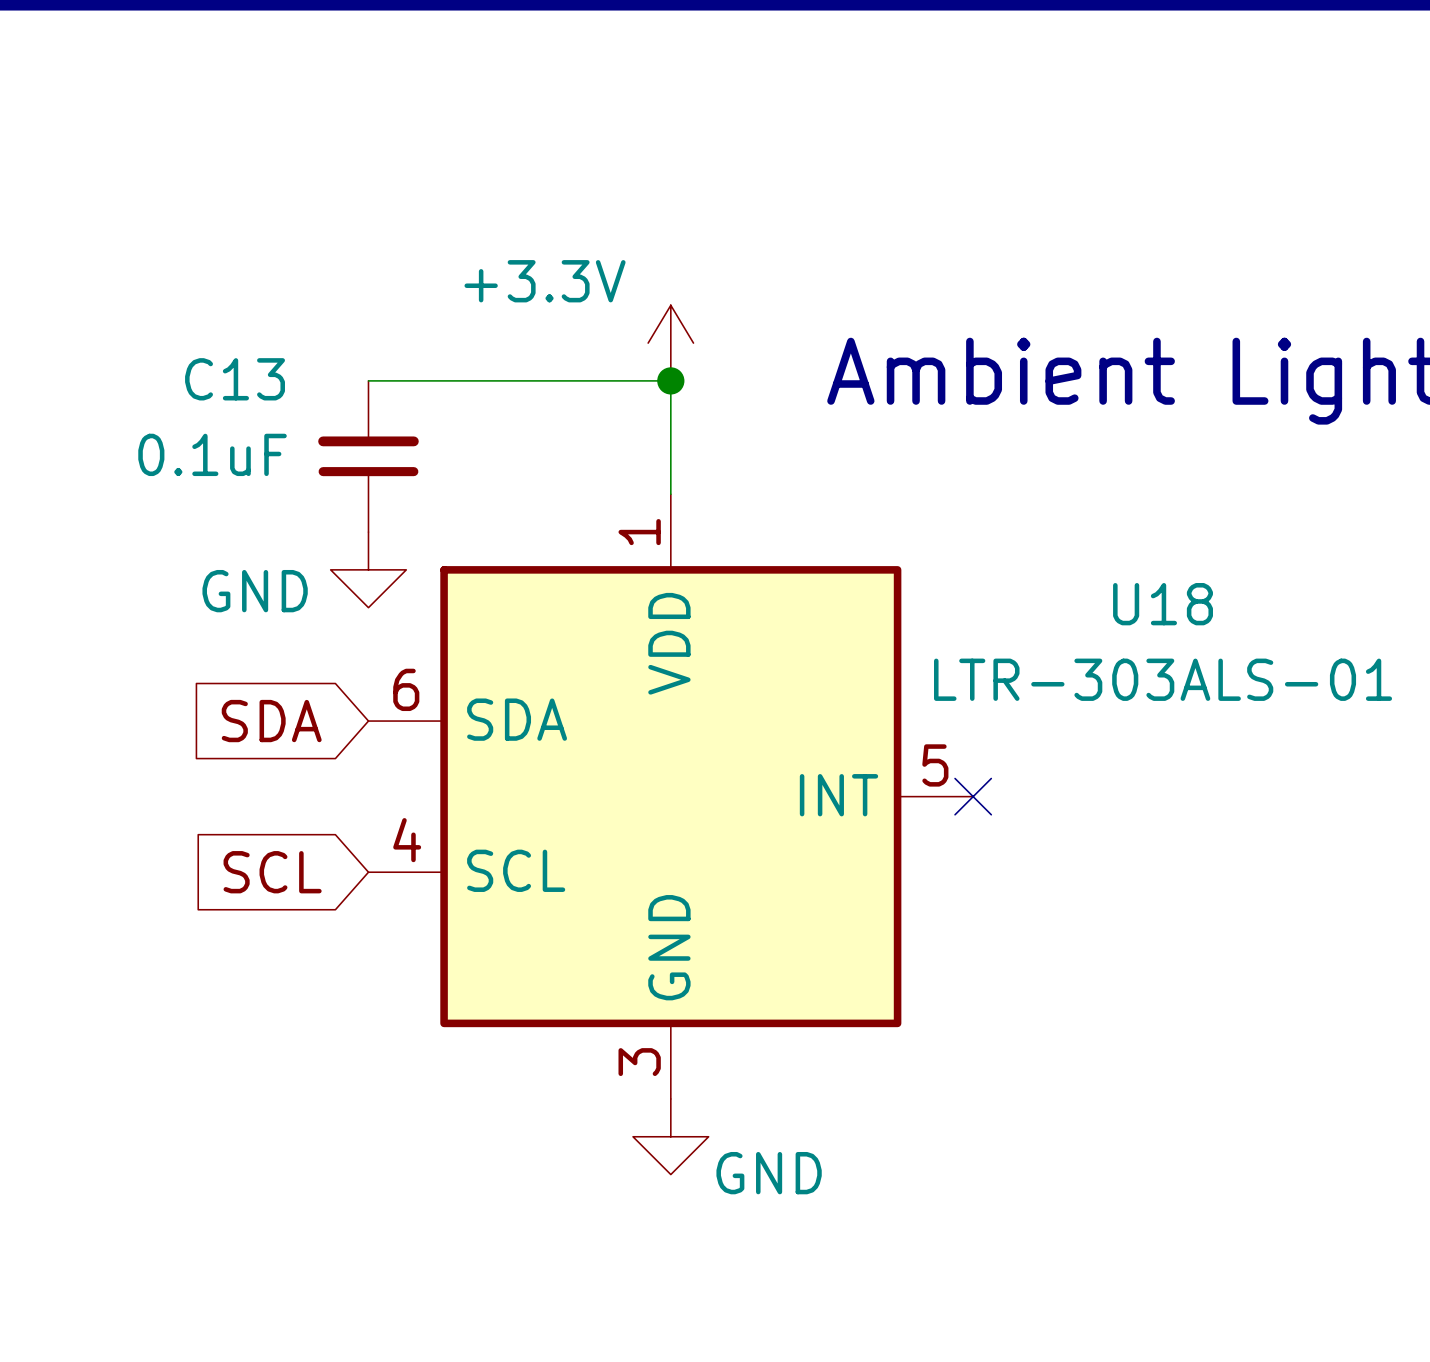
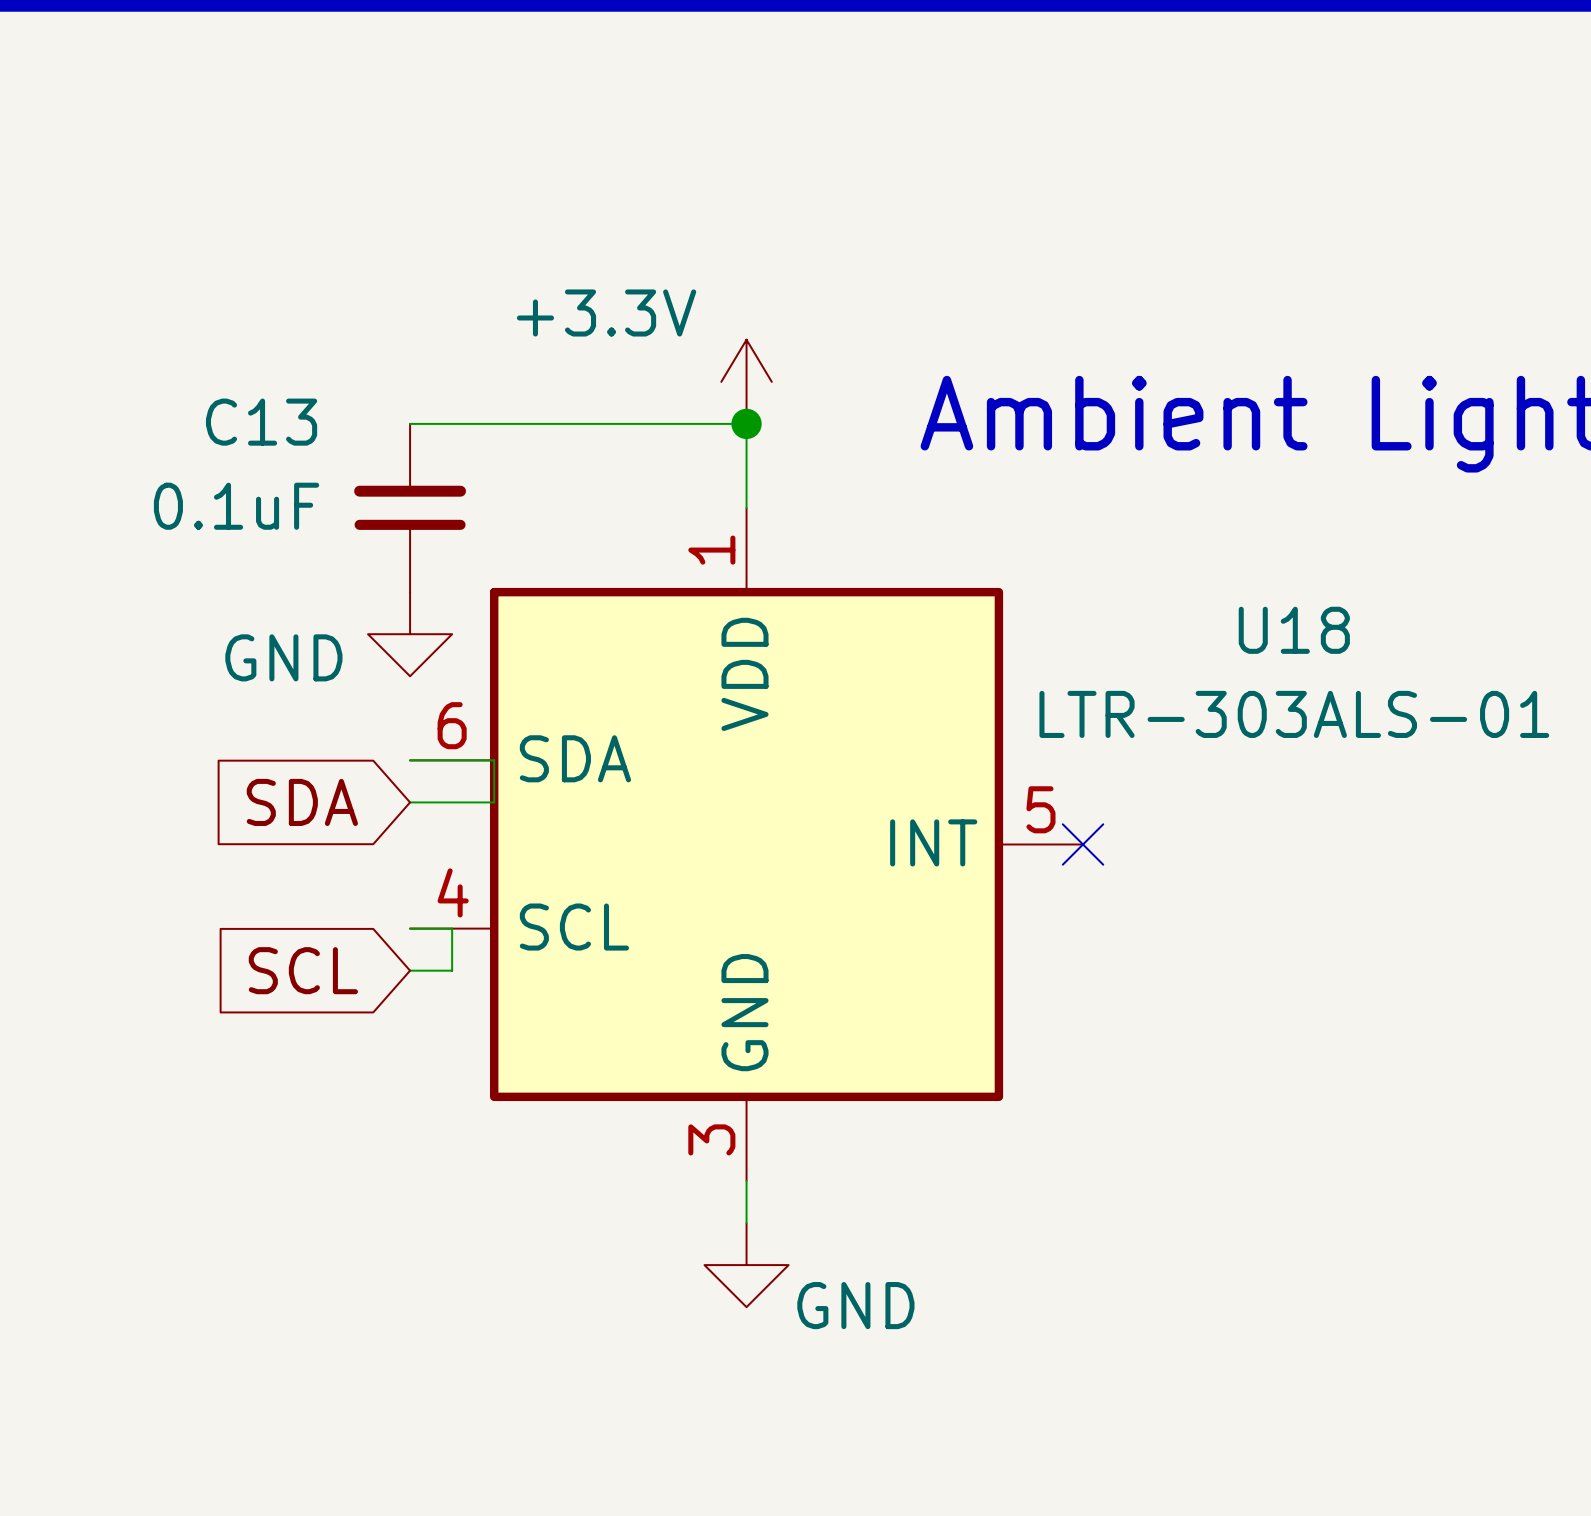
U18 position: (670, 796) -> (746, 844)
no-connect mark position: (973, 796) -> (1083, 844)
wire: none -> (410, 928) (452, 928) (452, 970) (410, 970)

